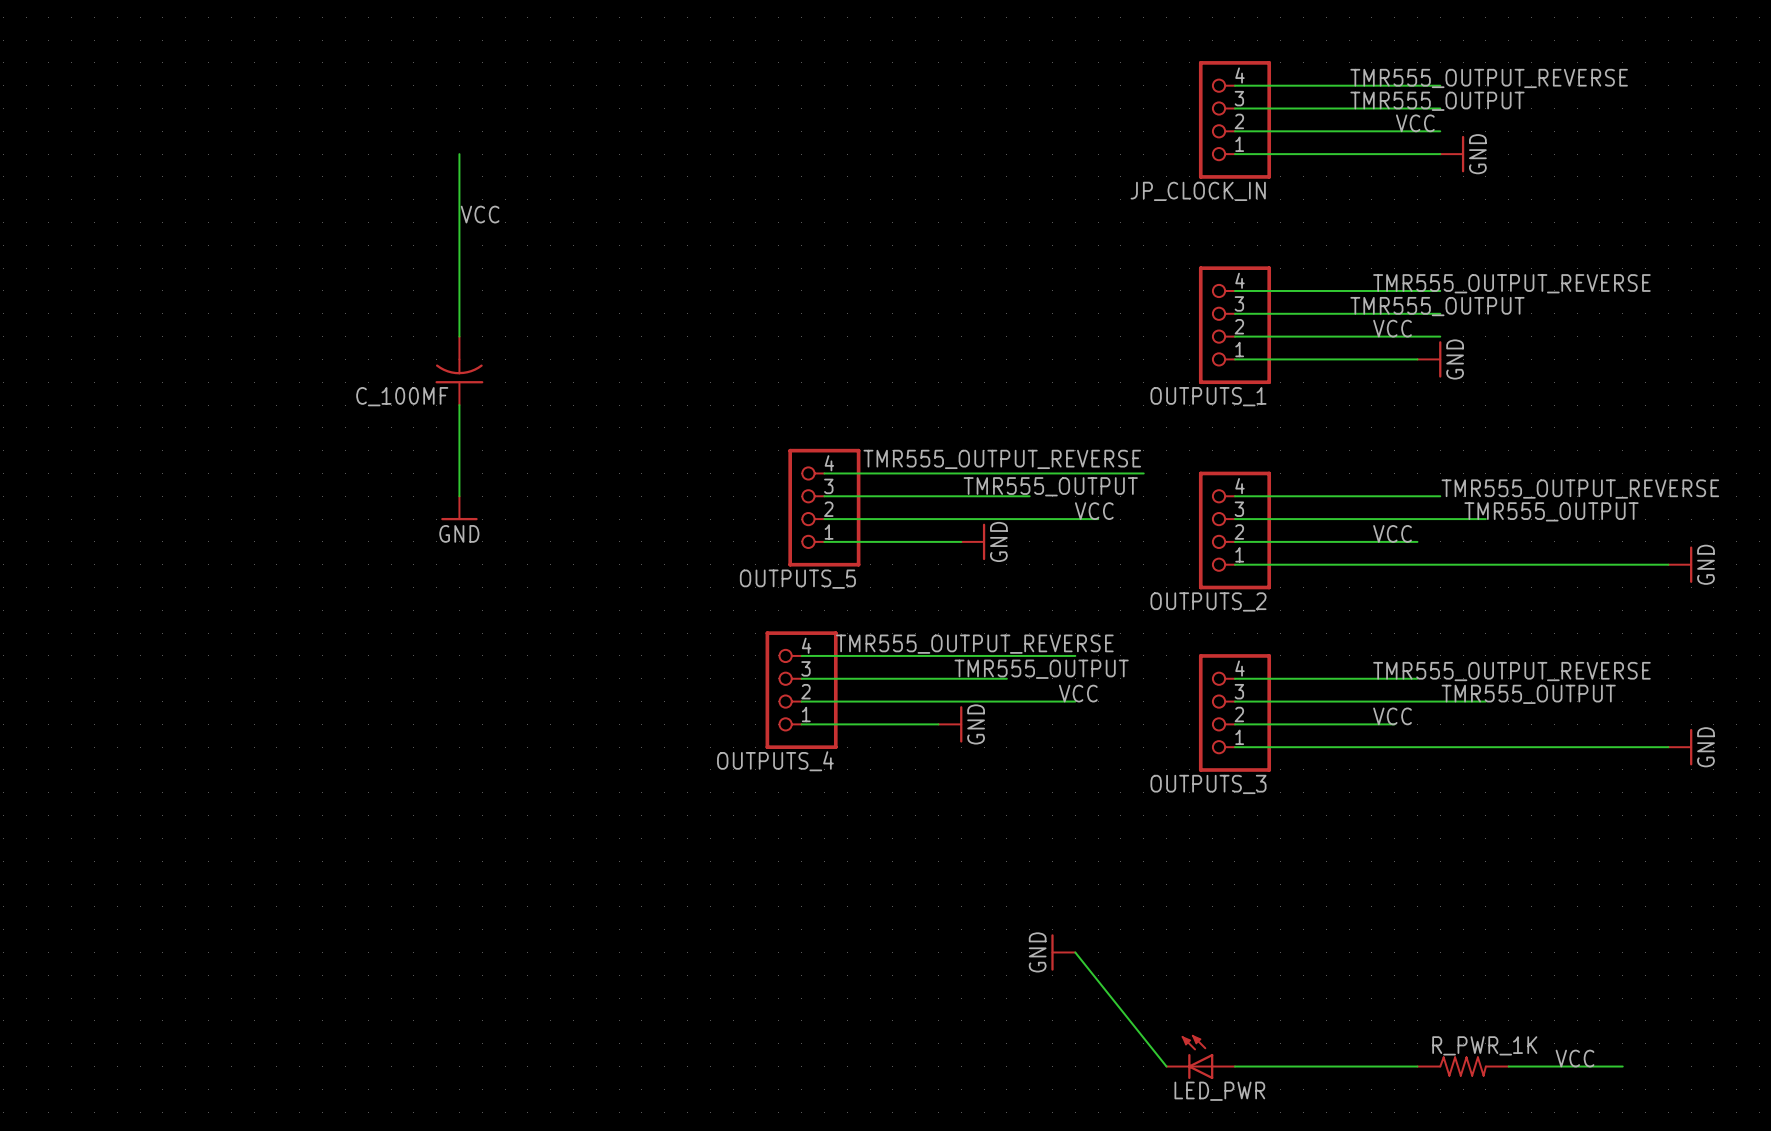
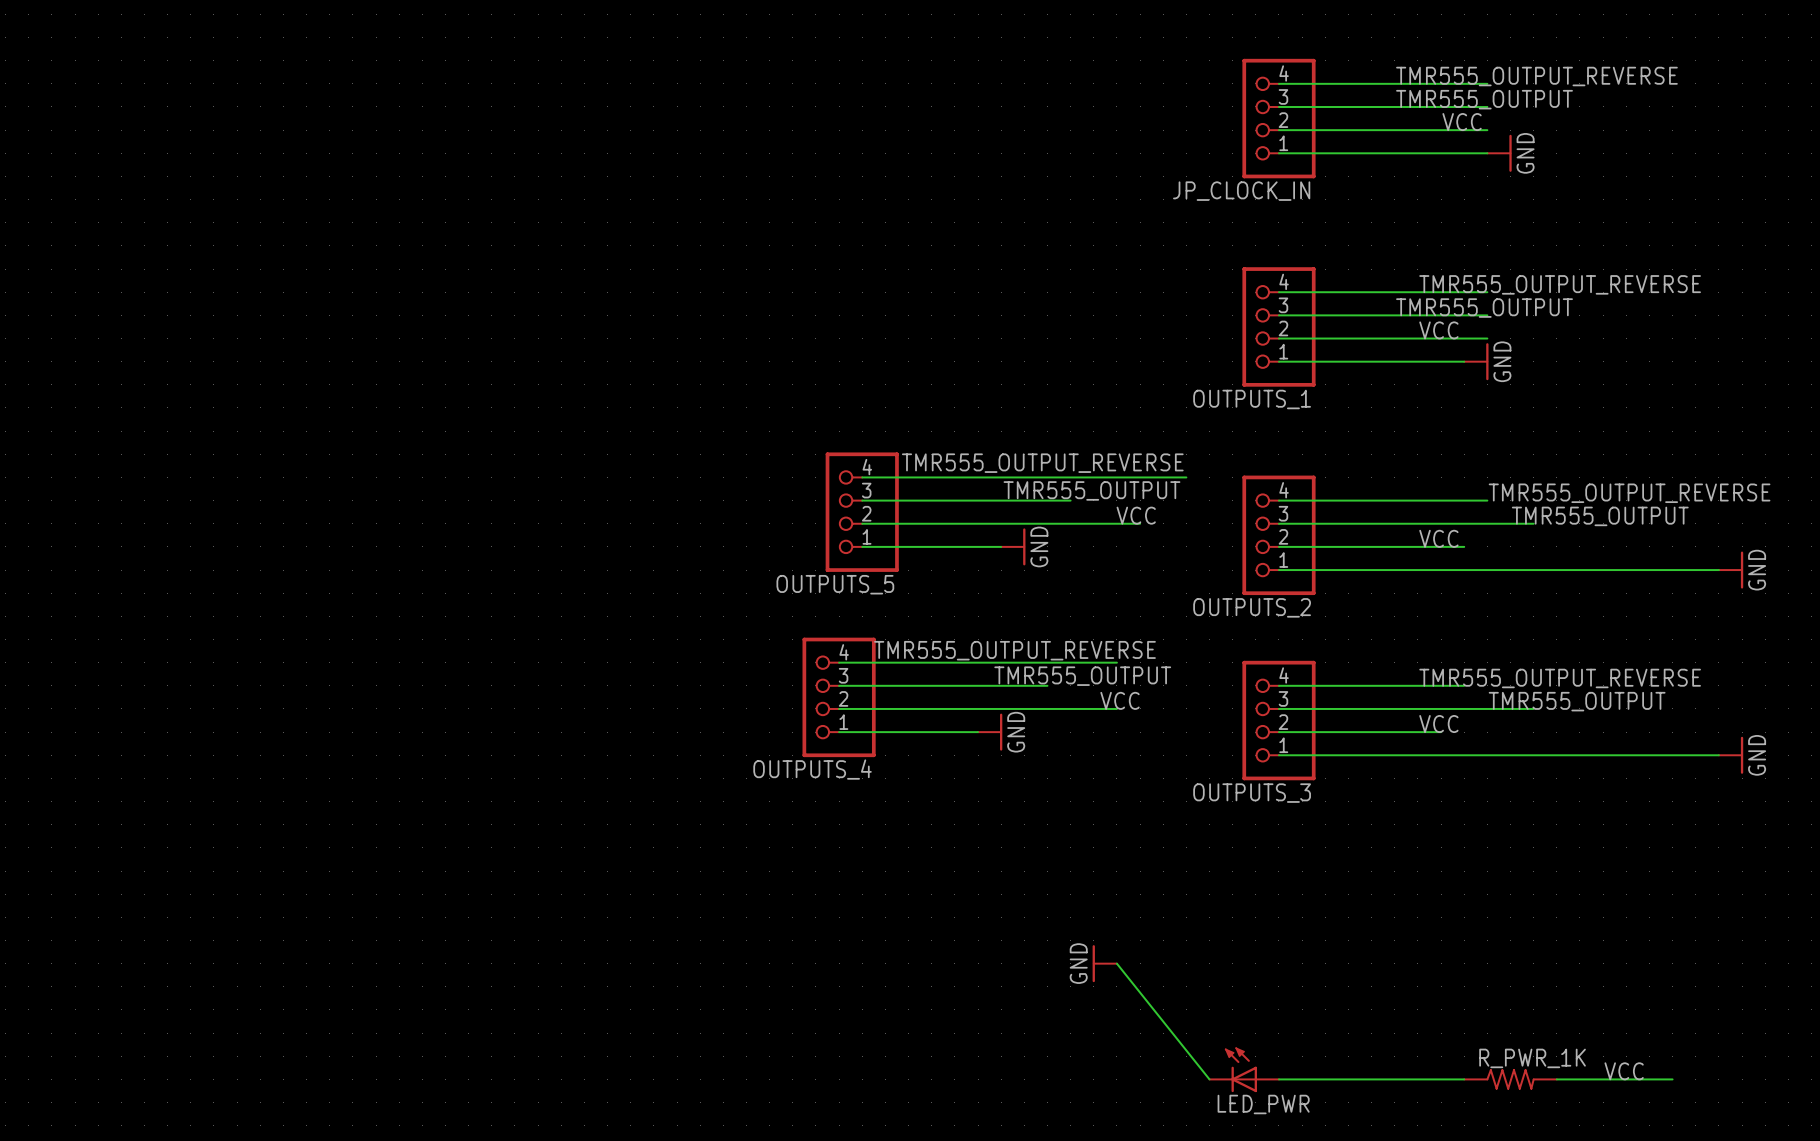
wire: (459, 154) (459, 336) -> none
label: VCC (480, 214) -> none
C_100MF: (459, 370) -> none
wire: (459, 405) (459, 496) -> none
power symbol: GND (459, 508) -> none

